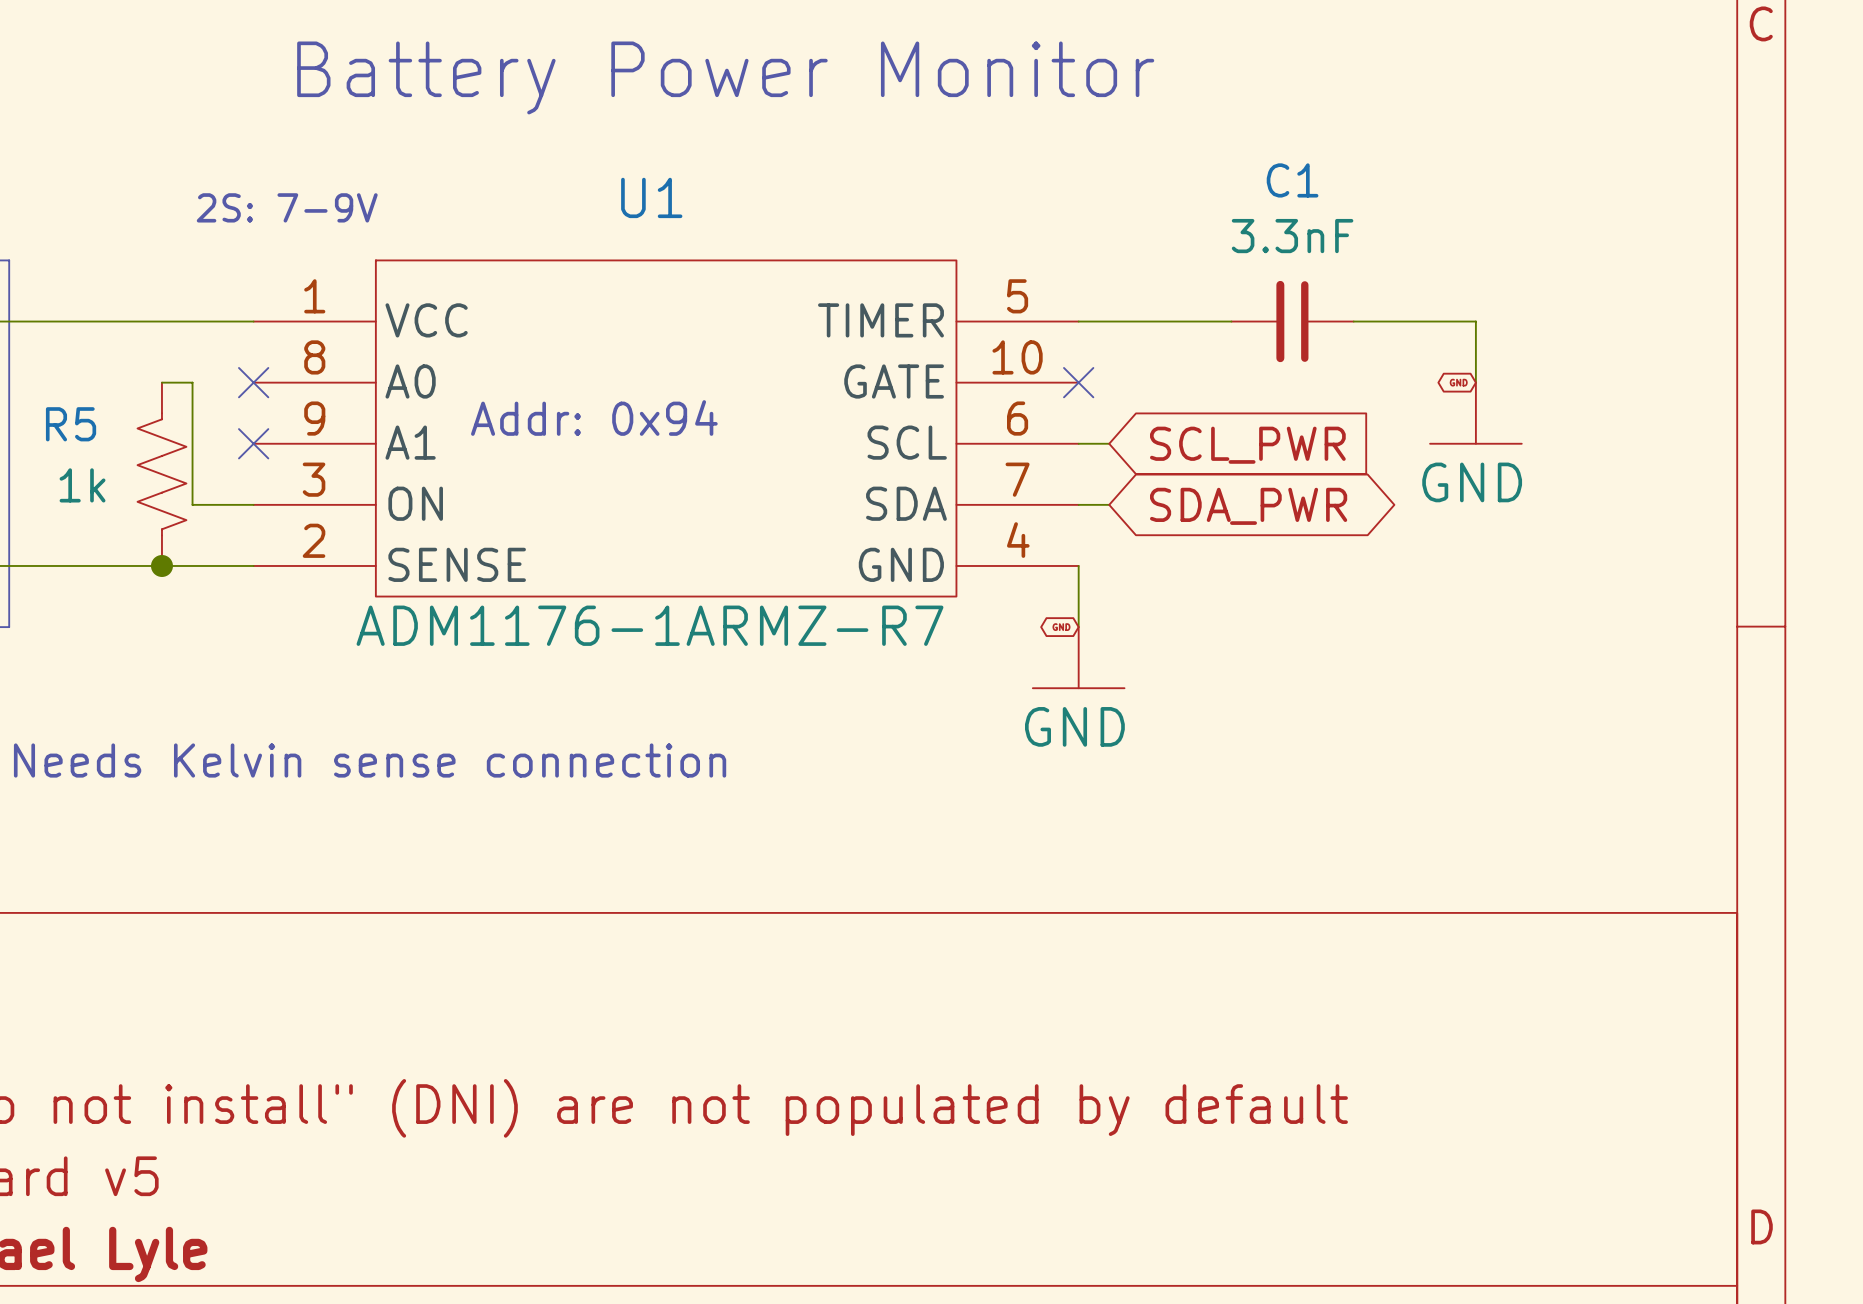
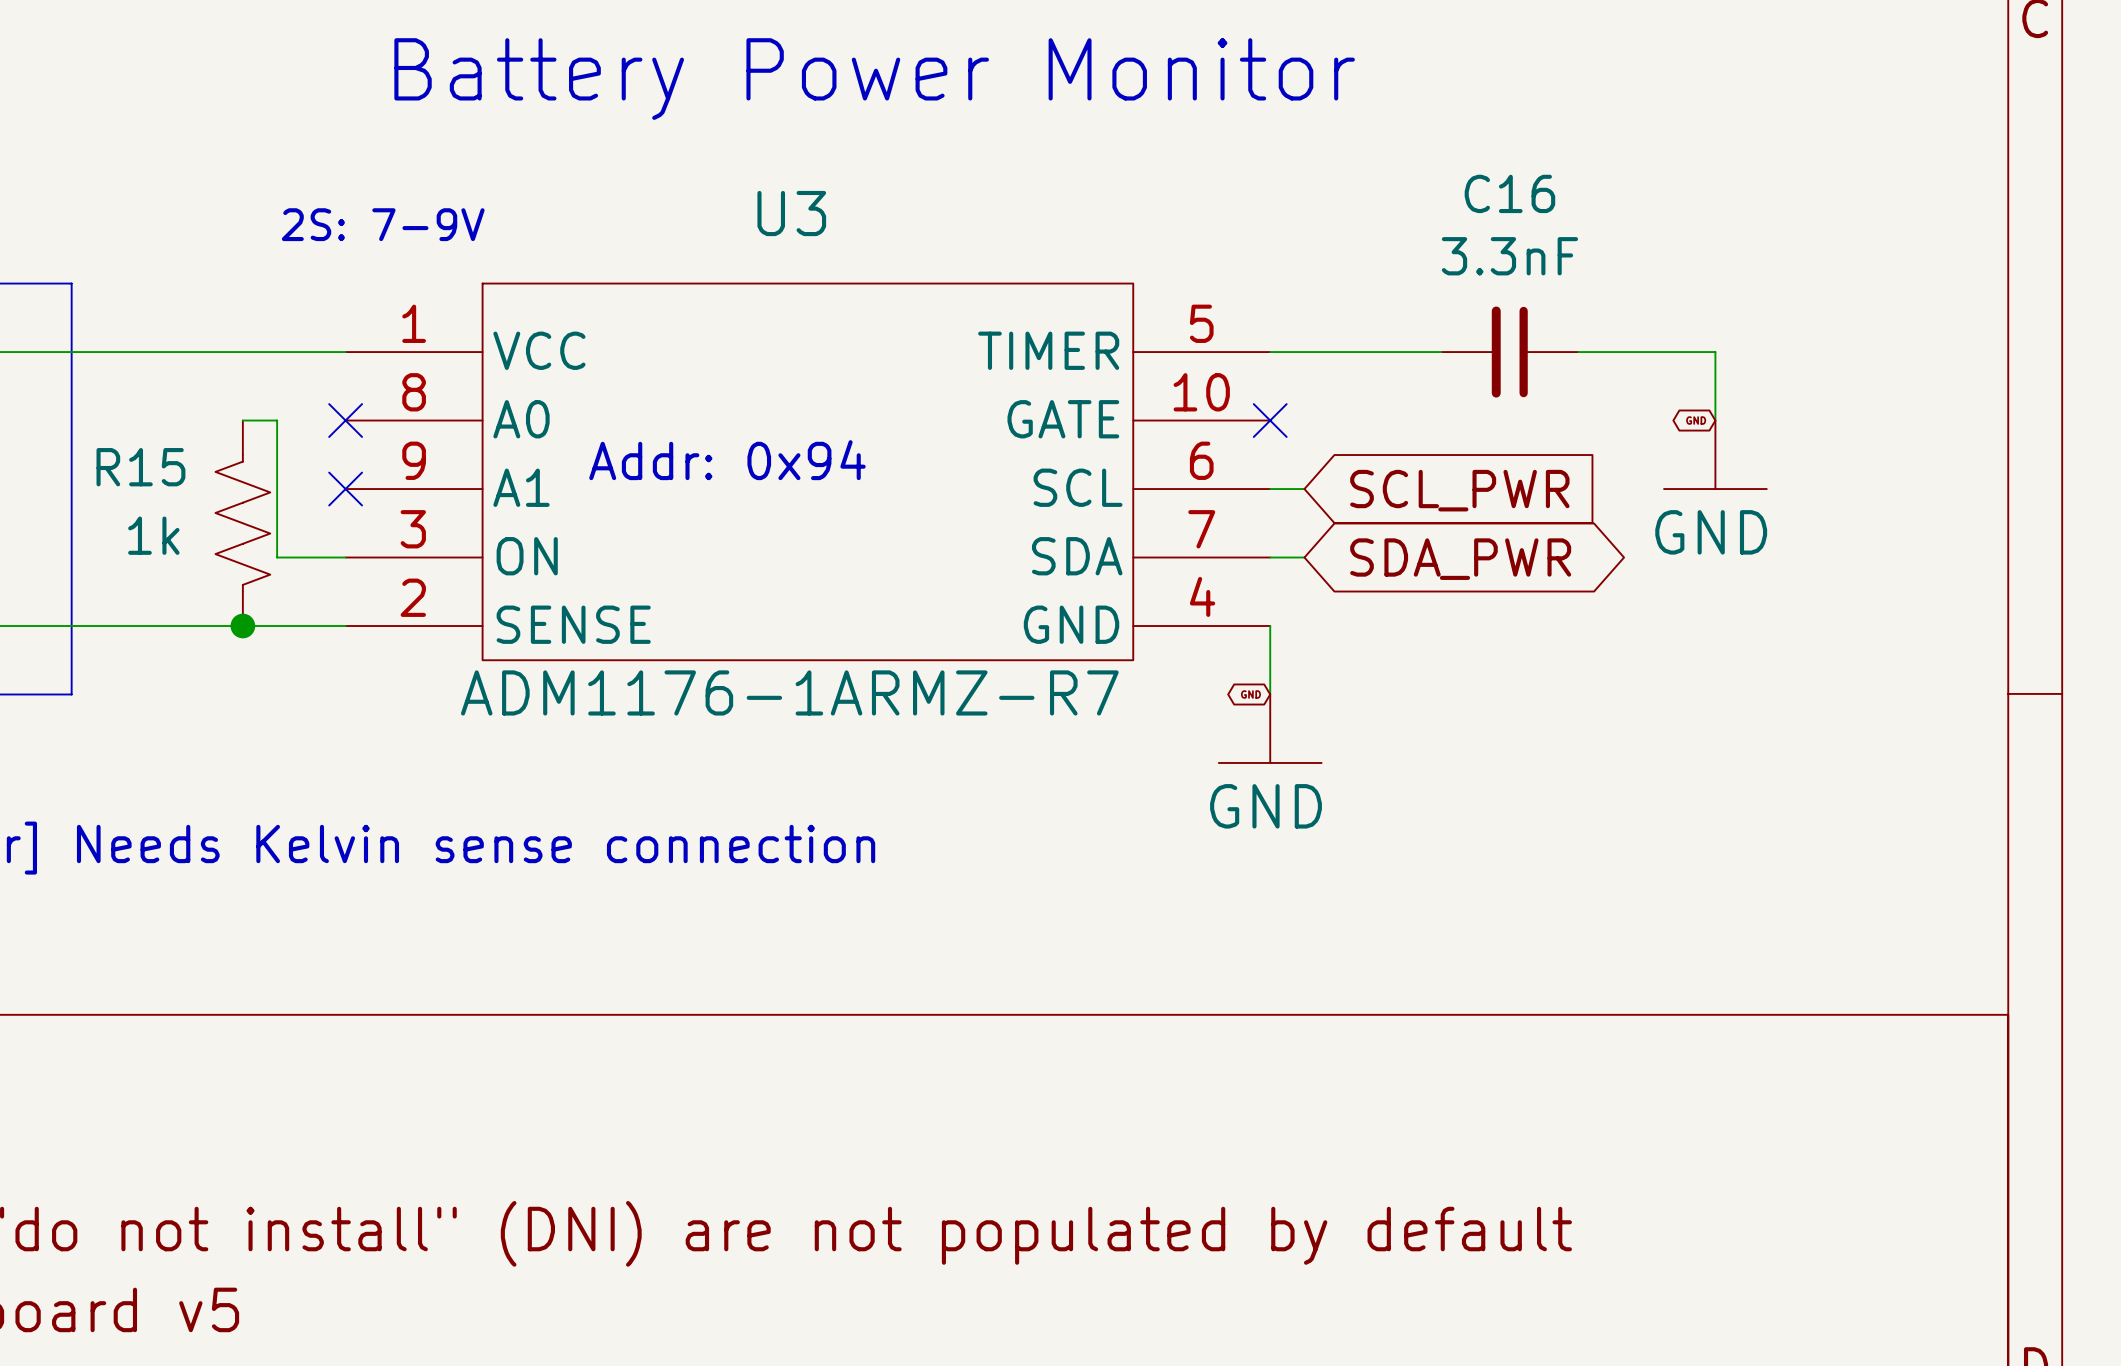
C1 name: C1 (1292, 180) -> C16 (1509, 193)
U1 name: U1 (651, 197) -> U3 (791, 213)
R5 name: R5 (71, 424) -> R15 (140, 467)

